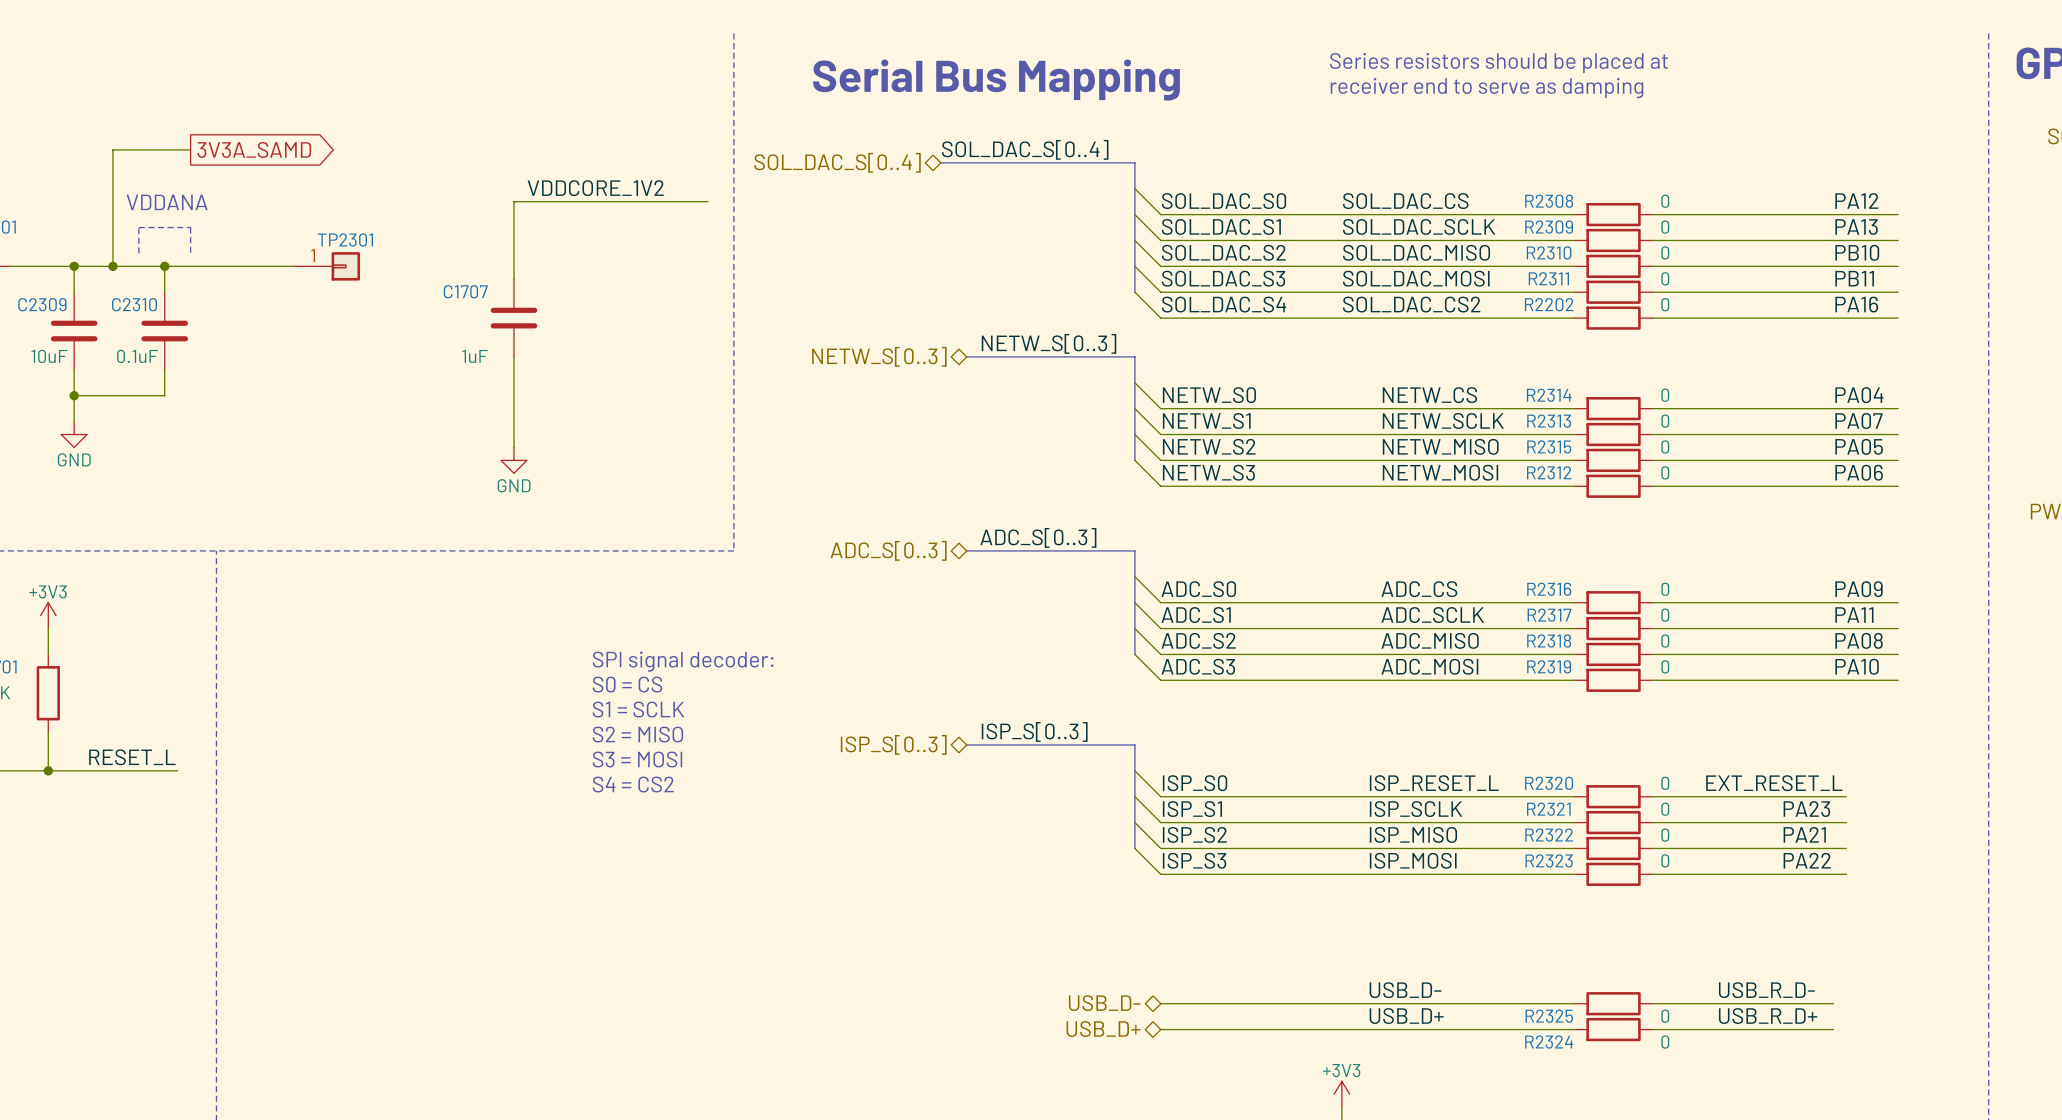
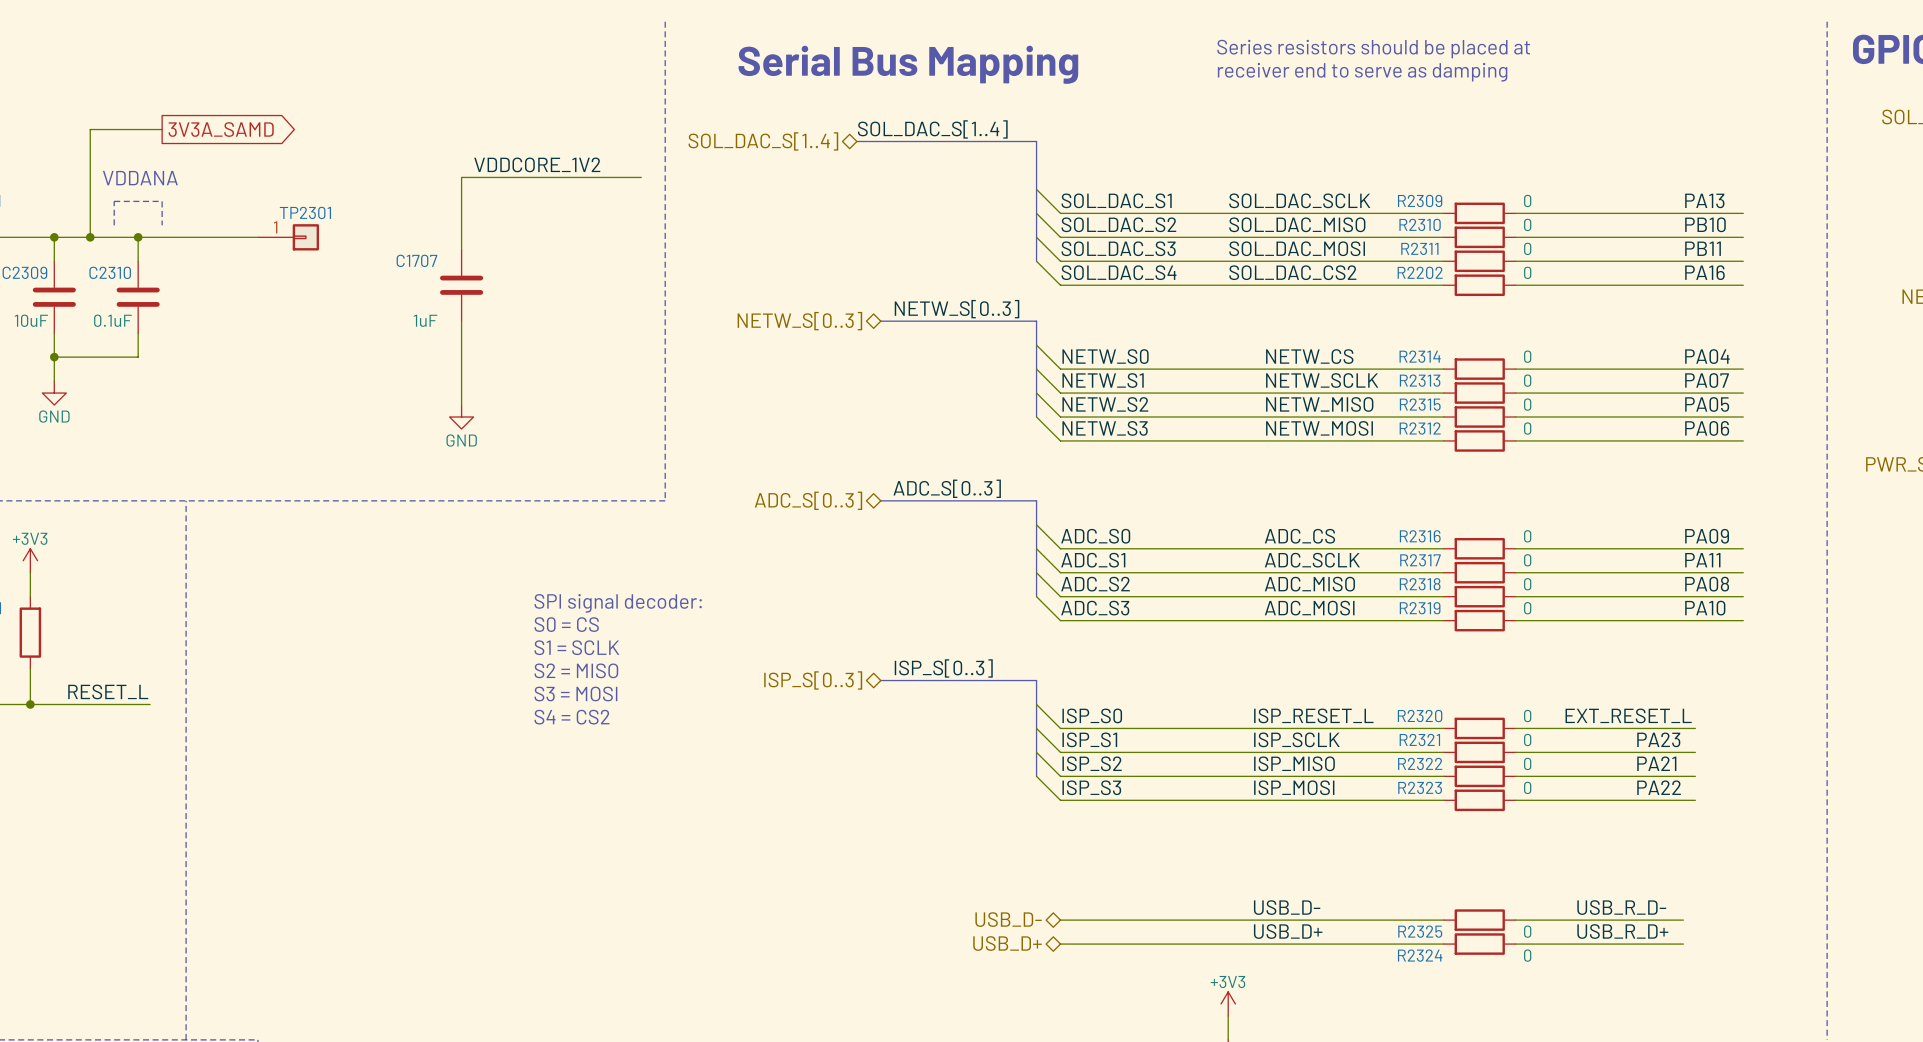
label: SOL_DAC_S[0..4] (1025, 149) -> SOL_DAC_S[1..4] (932, 129)
hierarchical label: SOL_DAC_S[0..4] (837, 162) -> SOL_DAC_S[1..4] (763, 141)
wire: (1134, 188) (1160, 214) (1574, 214) -> none
label: PA12 (1856, 200) -> none
label: SOL_DAC_S0 (1224, 201) -> none
label: SOL_DAC_CS (1405, 201) -> none
R2308: 0 (1613, 214) -> none
wire: (1652, 214) (1898, 214) -> none

